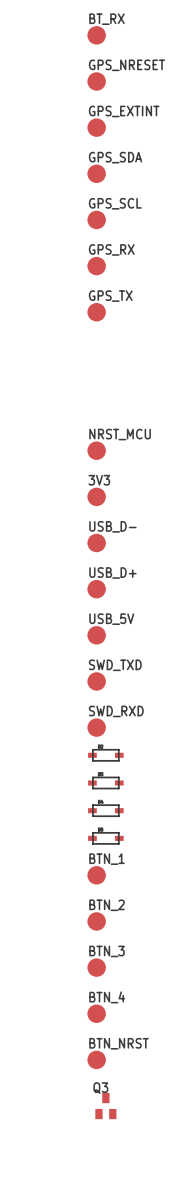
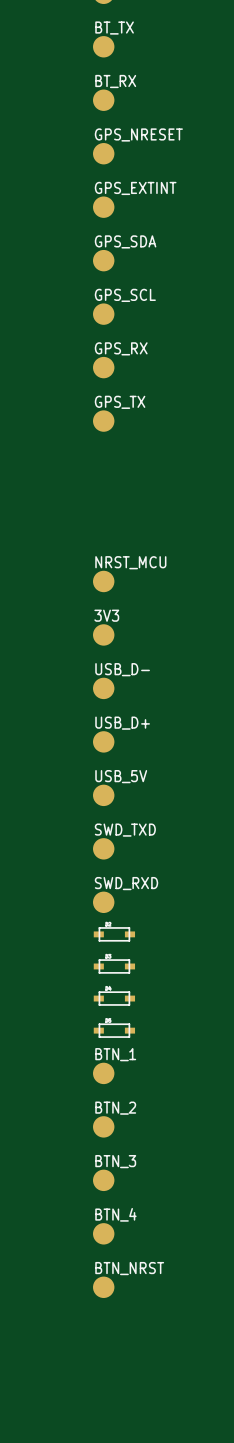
Q3: (105, 1106) -> none

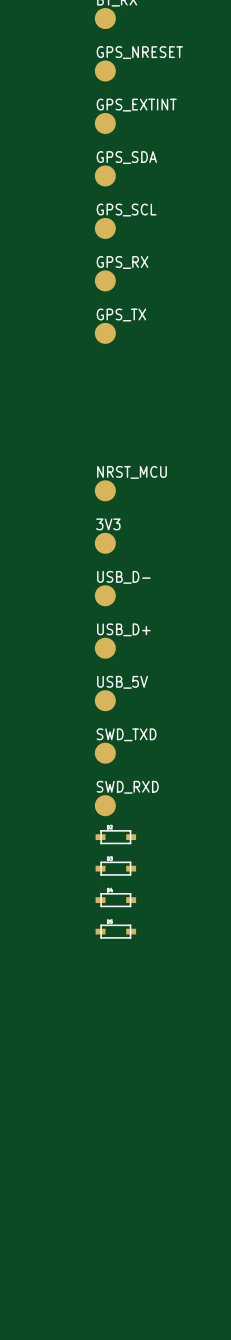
BTN_1: (103, 1073) -> none
BTN_2: (103, 1126) -> none
BTN_3: (103, 1180) -> none
BTN_4: (103, 1233) -> none
BTN_NRST: (103, 1287) -> none

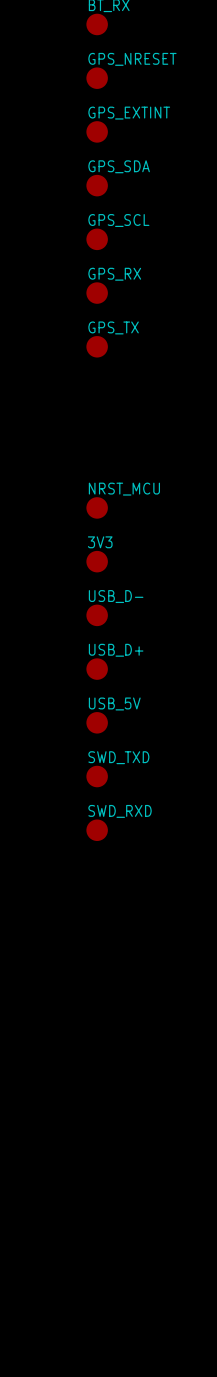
part: (115, 837) -> none
part: (115, 868) -> none
part: (115, 900) -> none
part: (115, 931) -> none

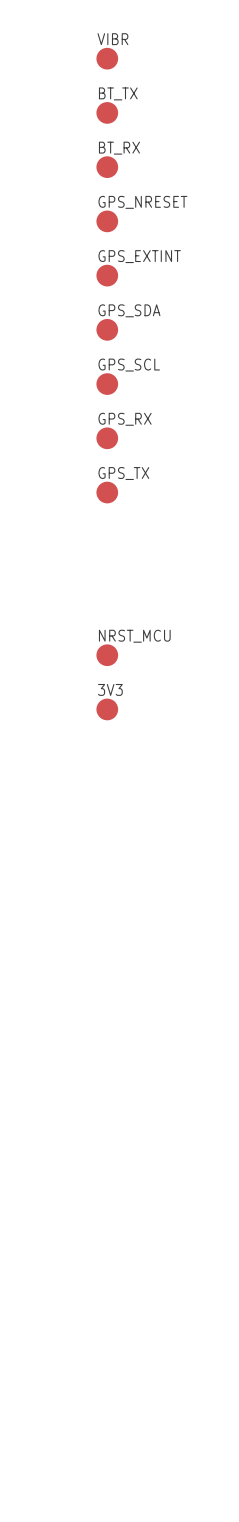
USB_D-: (97, 615) -> none
USB_D+: (97, 669) -> none
USB_5V: (97, 722) -> none
SWD_TXD: (97, 776) -> none
SWD_RXD: (97, 830) -> none

